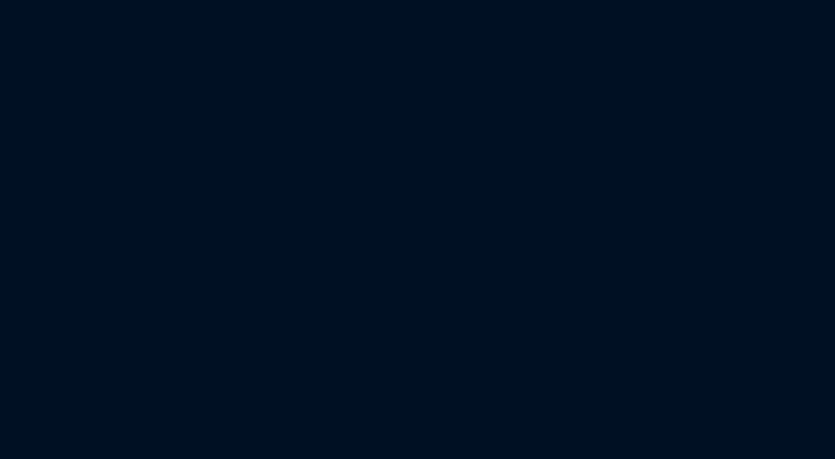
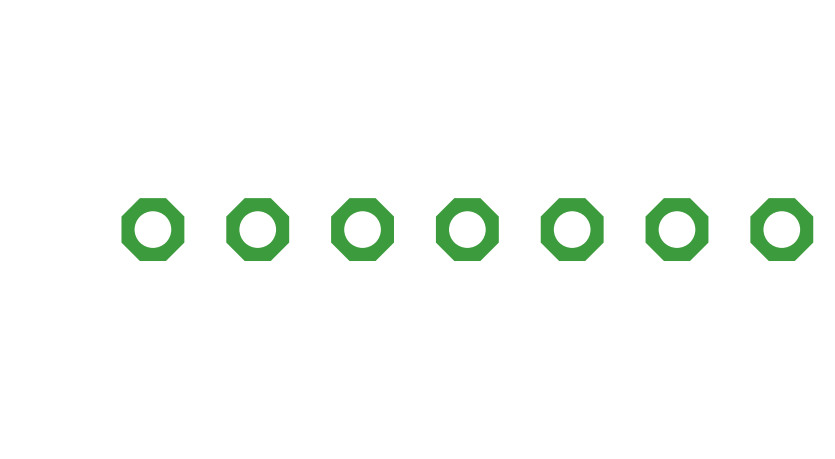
part: none -> (467, 229)

